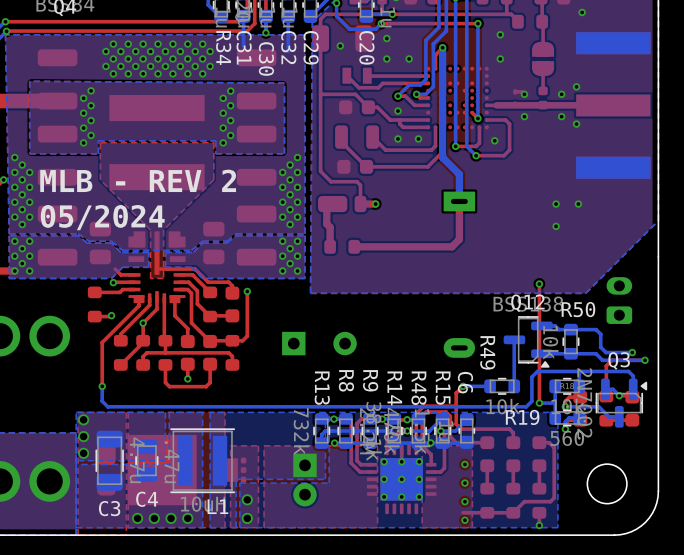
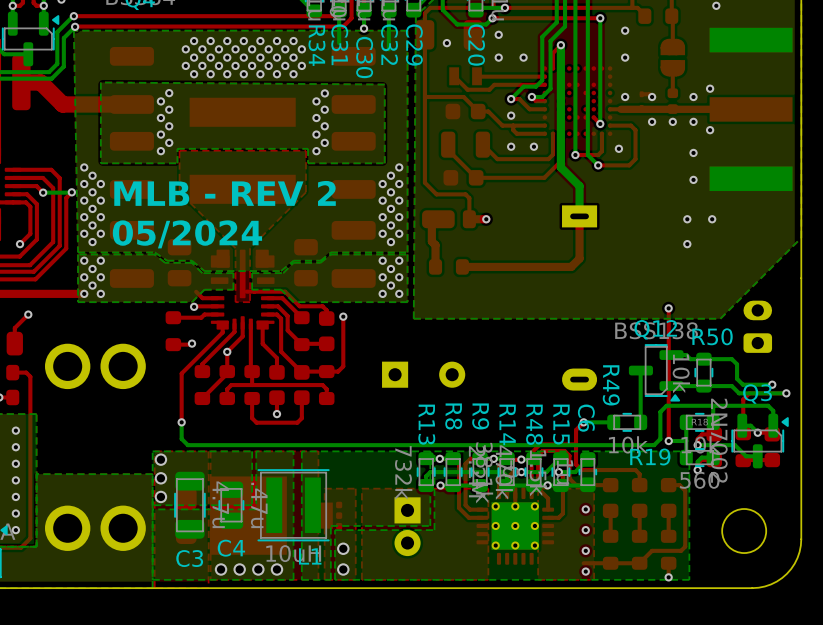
via: none -> (625, 96)
via: none -> (672, 121)
via: none -> (693, 152)
via: none -> (693, 179)

